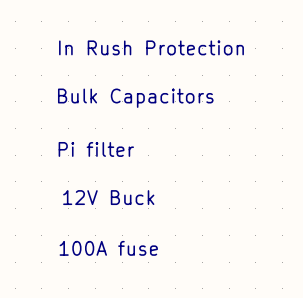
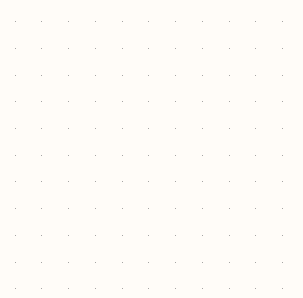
text: In Rush Protection (151, 47) -> none
text: Bulk Capacitors (135, 98) -> none
text: Pi filter (96, 149) -> none
text: 12V Buck (108, 197) -> none
text: 100A fuse (108, 248) -> none

